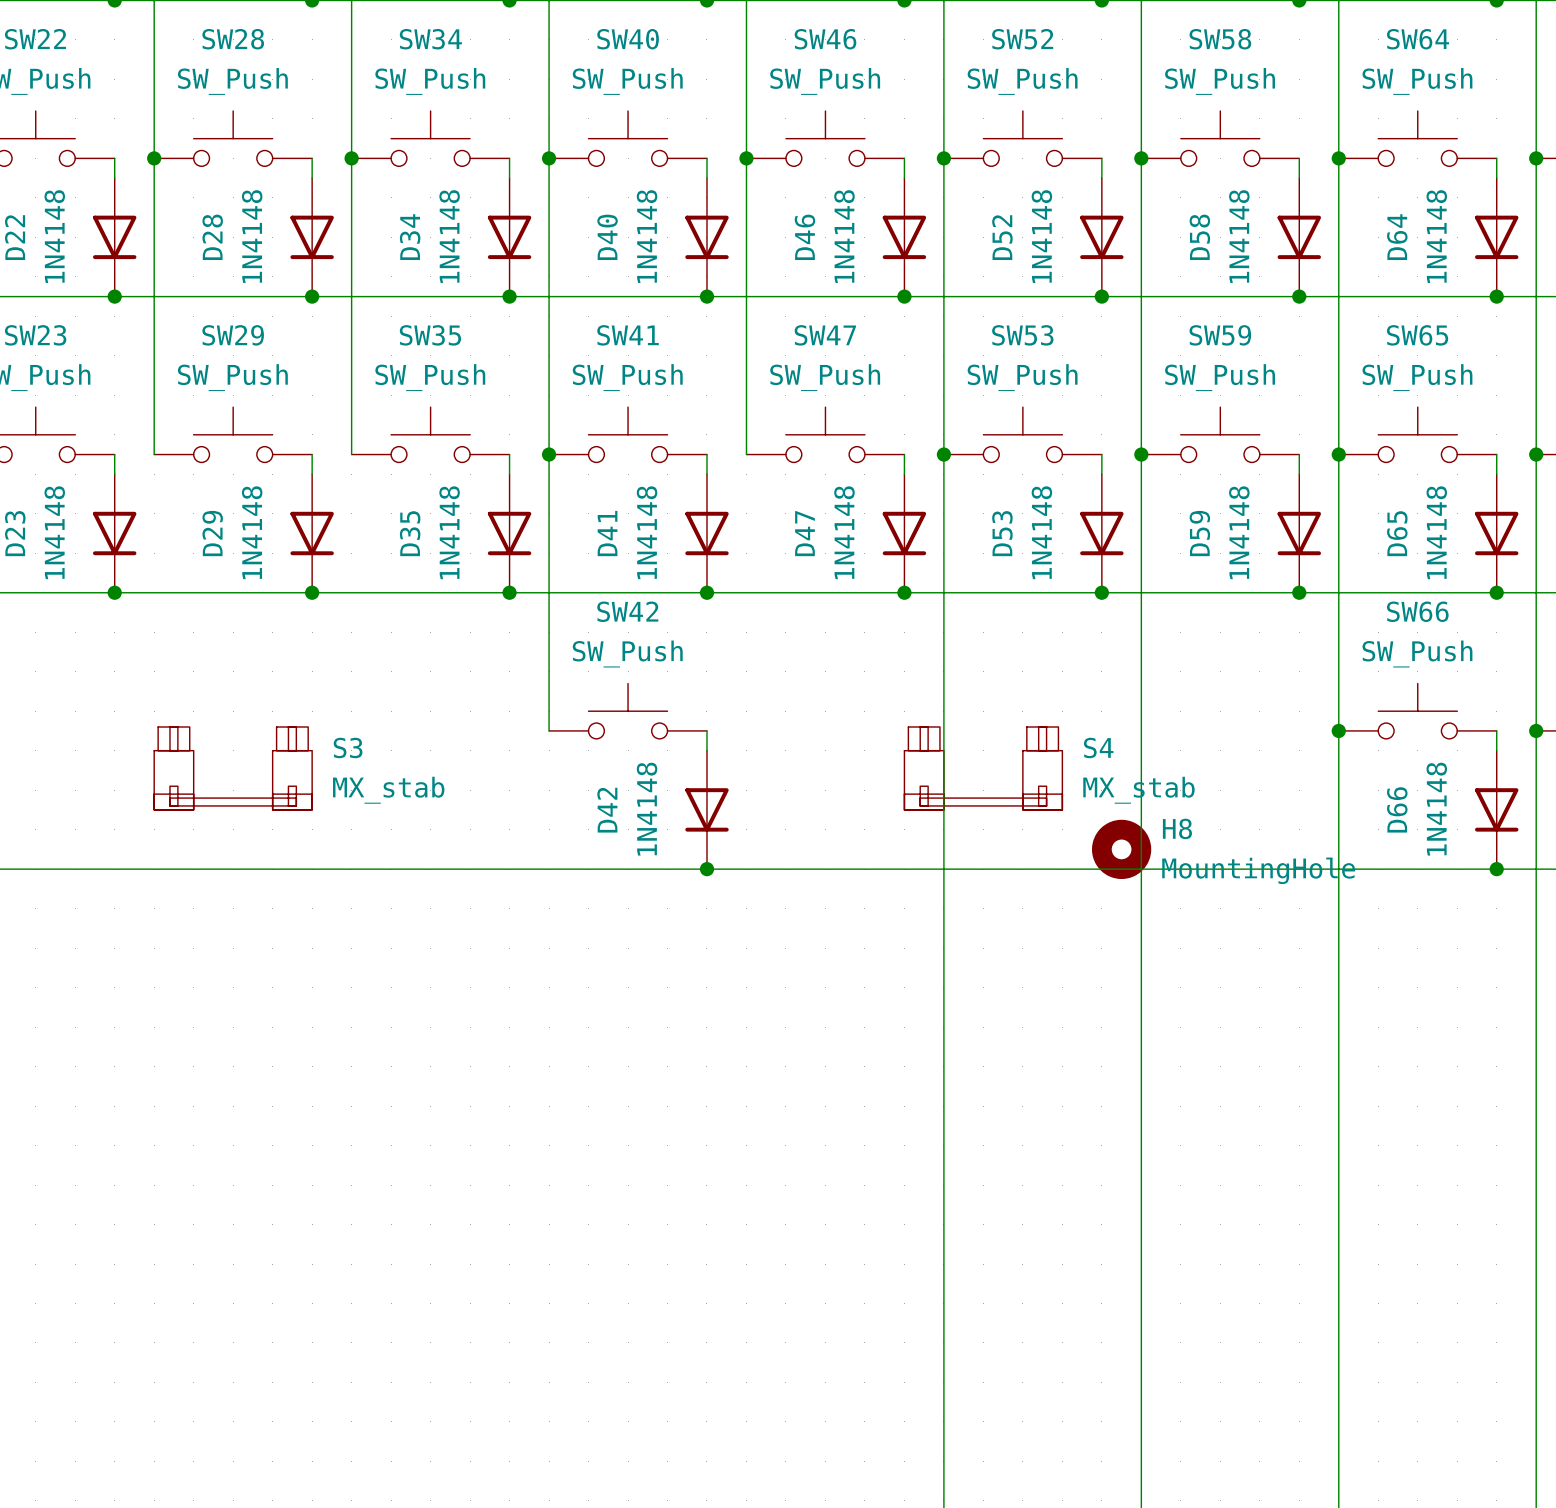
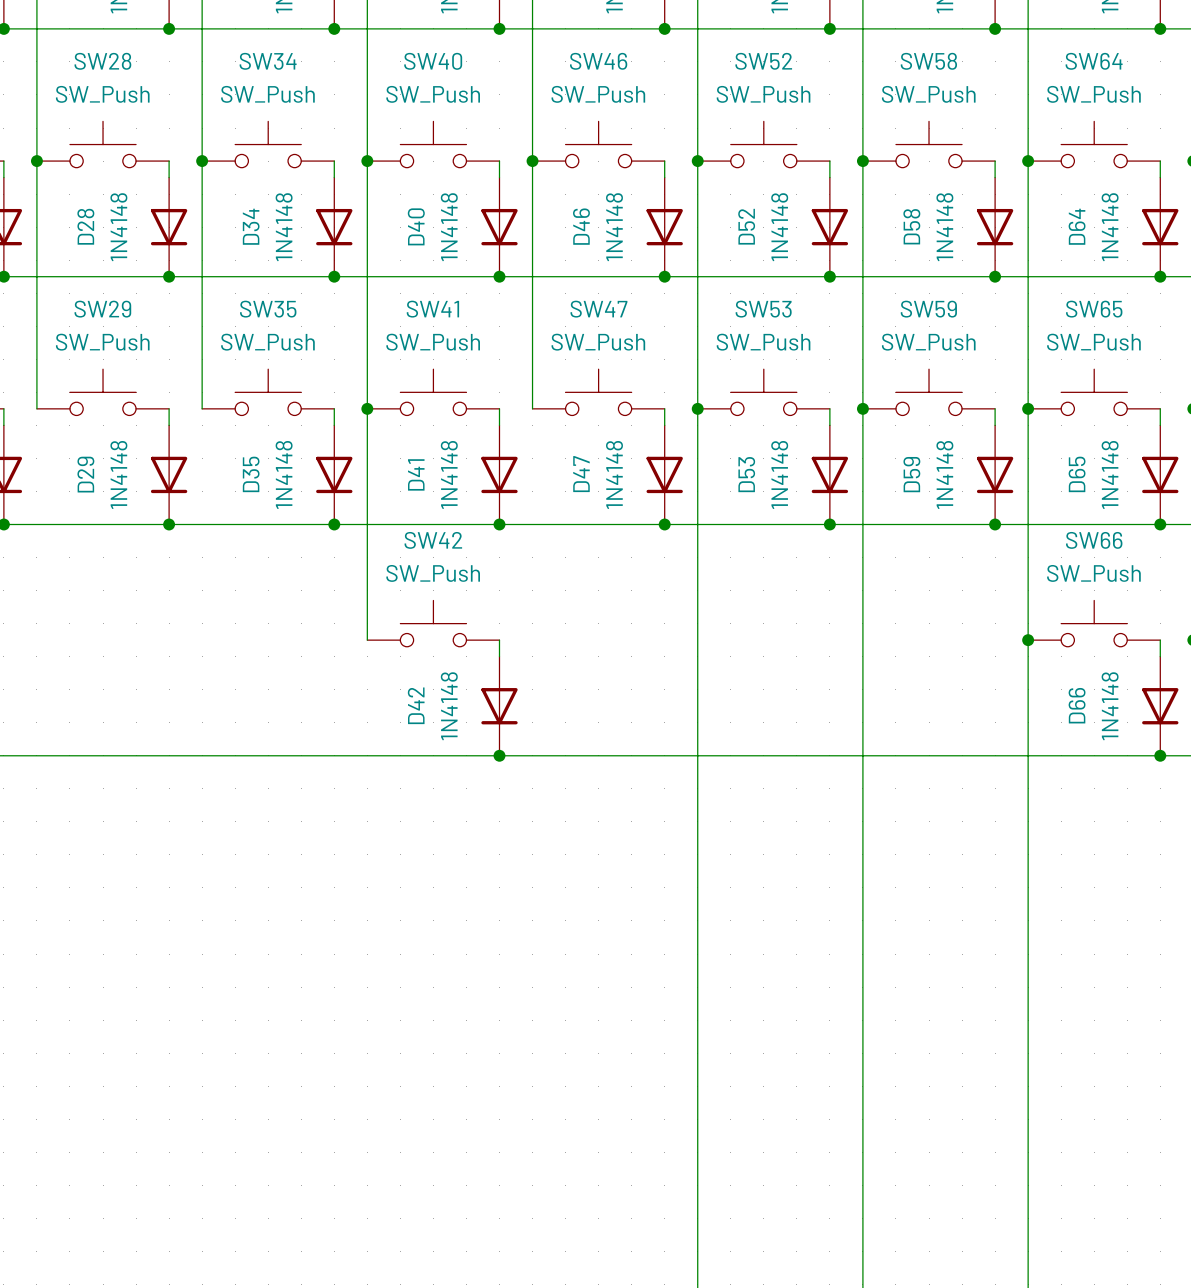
S3: MX_stab (233, 768) -> none
S4: MX_stab (983, 768) -> none
H8: MountingHole (1121, 849) -> none

